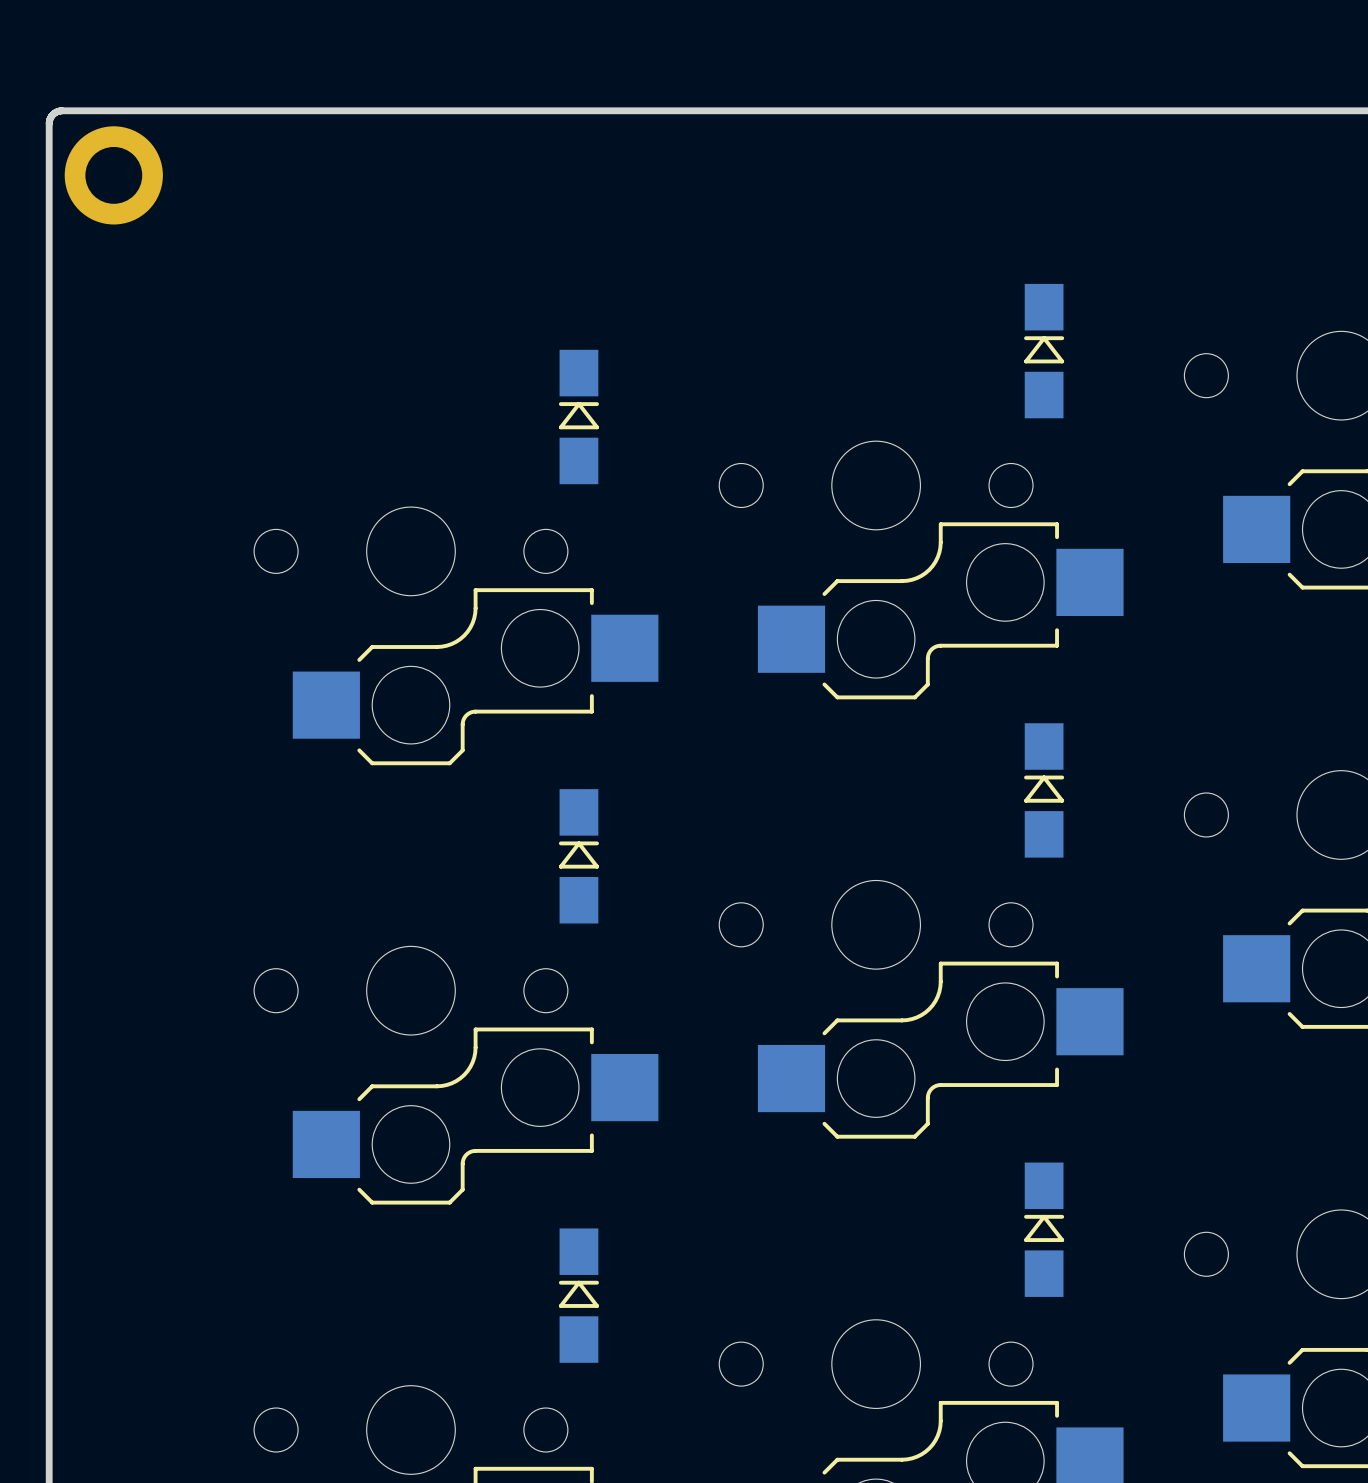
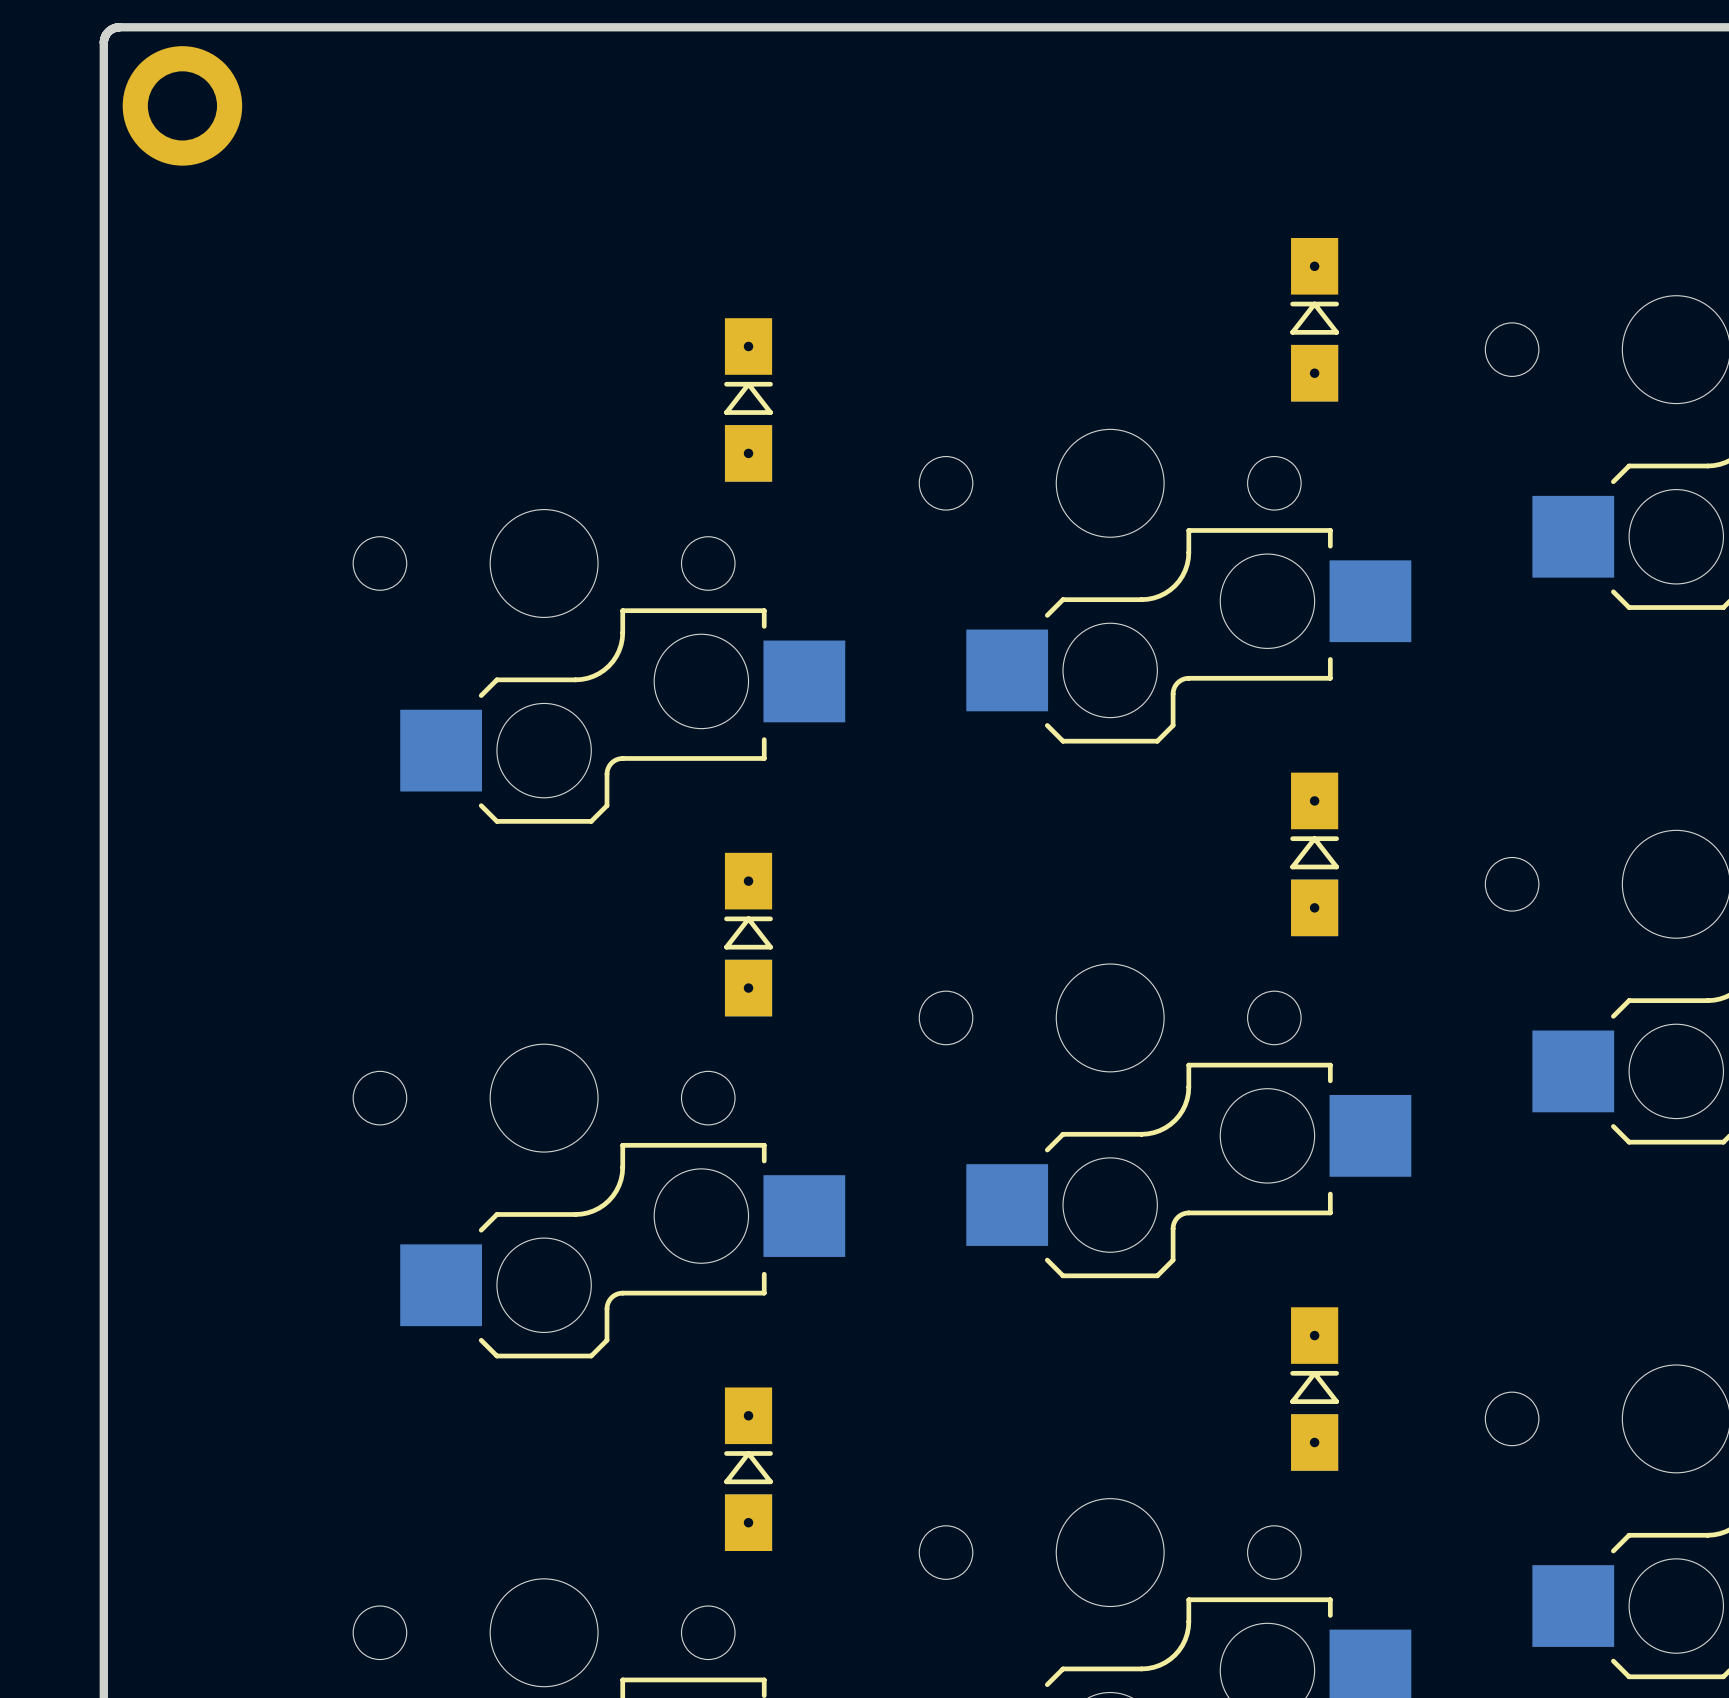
part footprint: [1024, 283, 1065, 419] -> [1290, 237, 1339, 402]
part footprint: [558, 349, 599, 485] -> [724, 318, 773, 482]
part footprint: [1024, 723, 1065, 858] -> [1290, 772, 1339, 937]
part footprint: [558, 789, 599, 924] -> [724, 852, 773, 1017]
part footprint: [1024, 1162, 1065, 1297] -> [1290, 1307, 1339, 1471]
part footprint: [558, 1228, 599, 1363] -> [724, 1387, 773, 1552]

